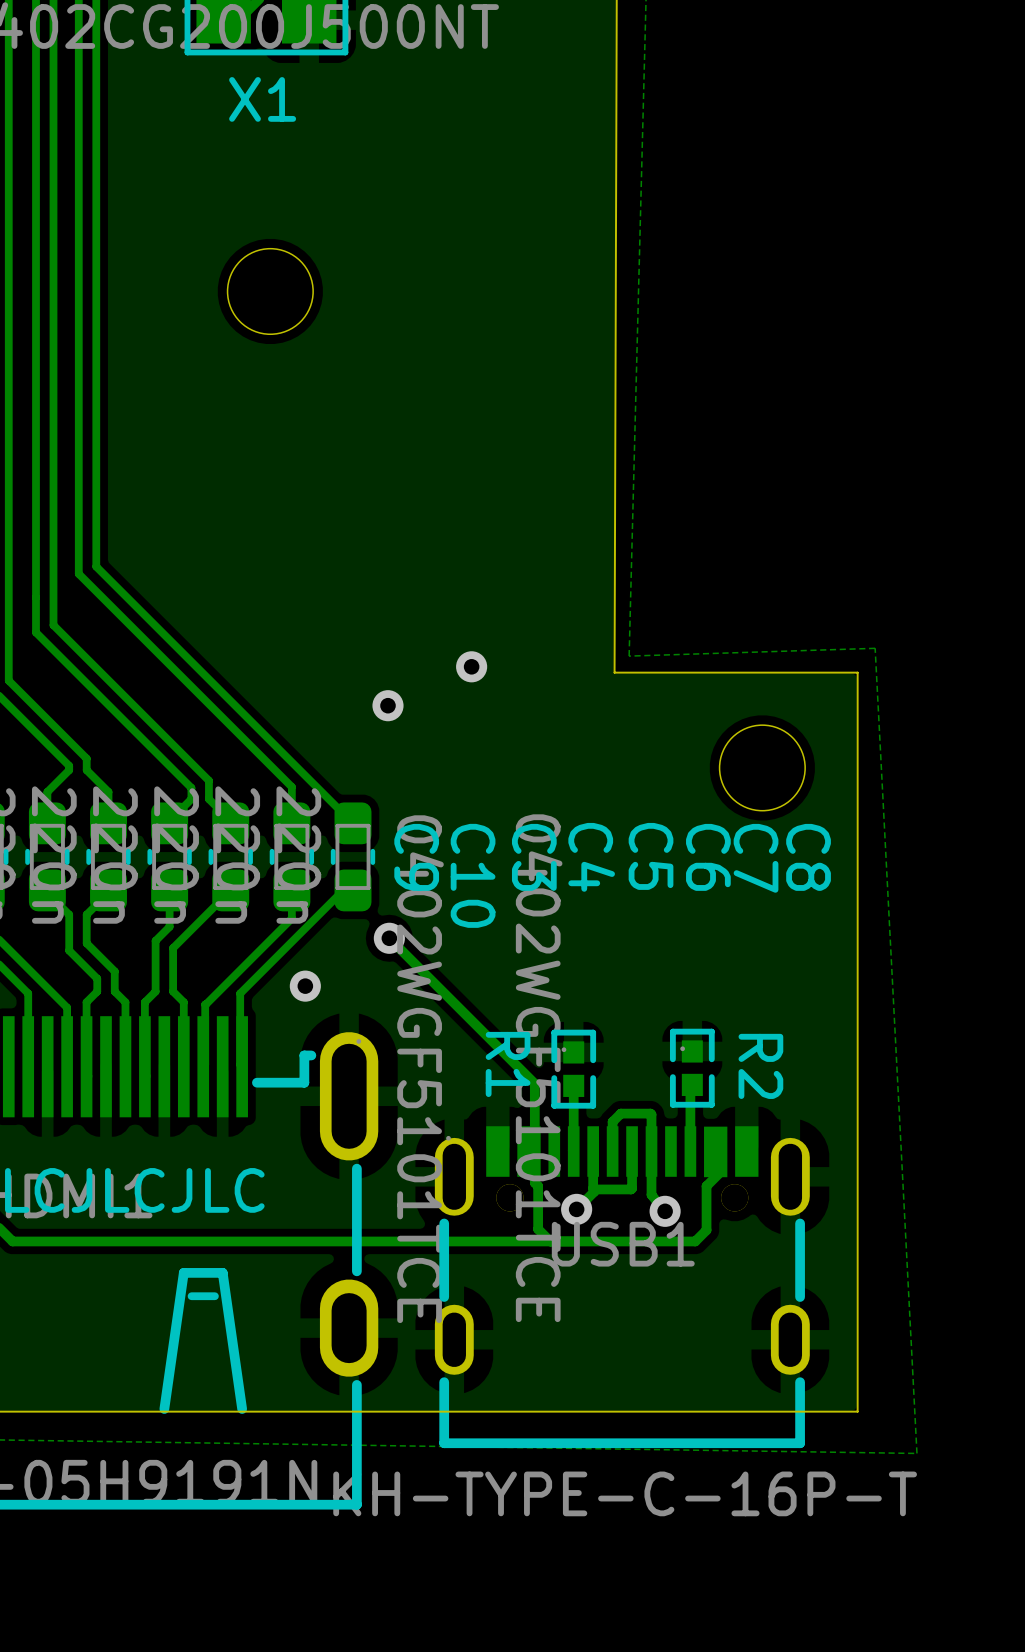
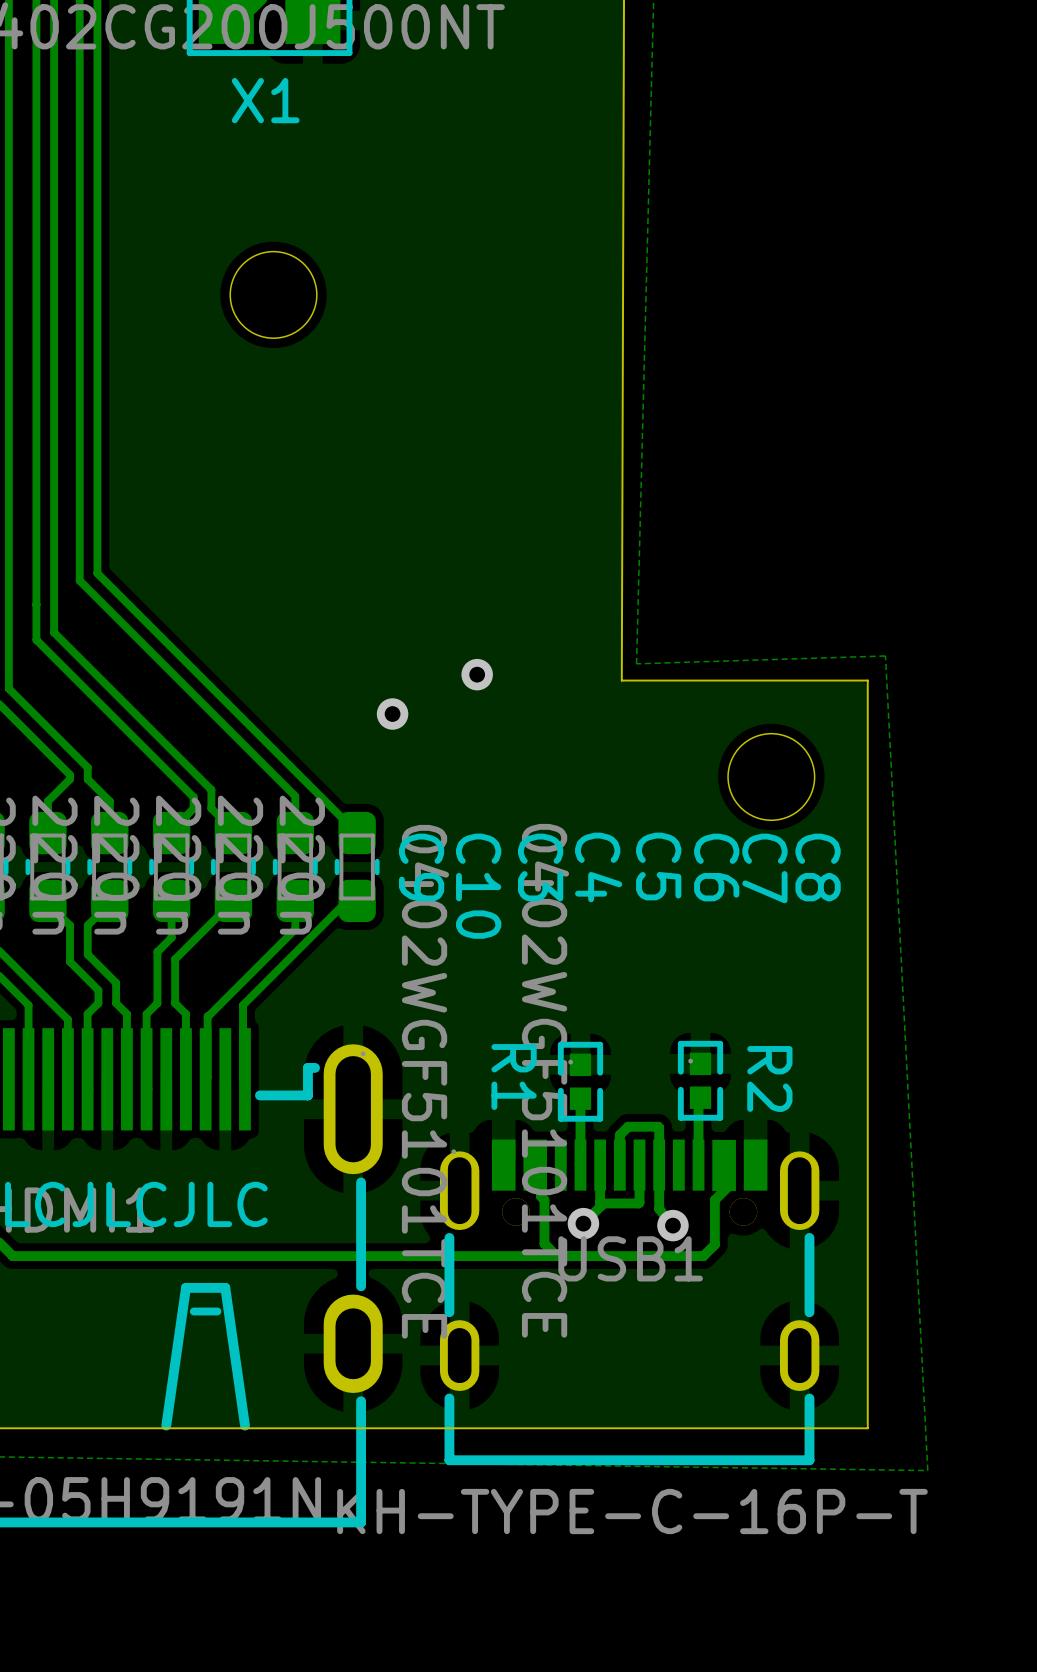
track: (389, 938) (534, 1083) (534, 1151) -> none
via: (389, 938) -> none
via: (305, 986) -> none

